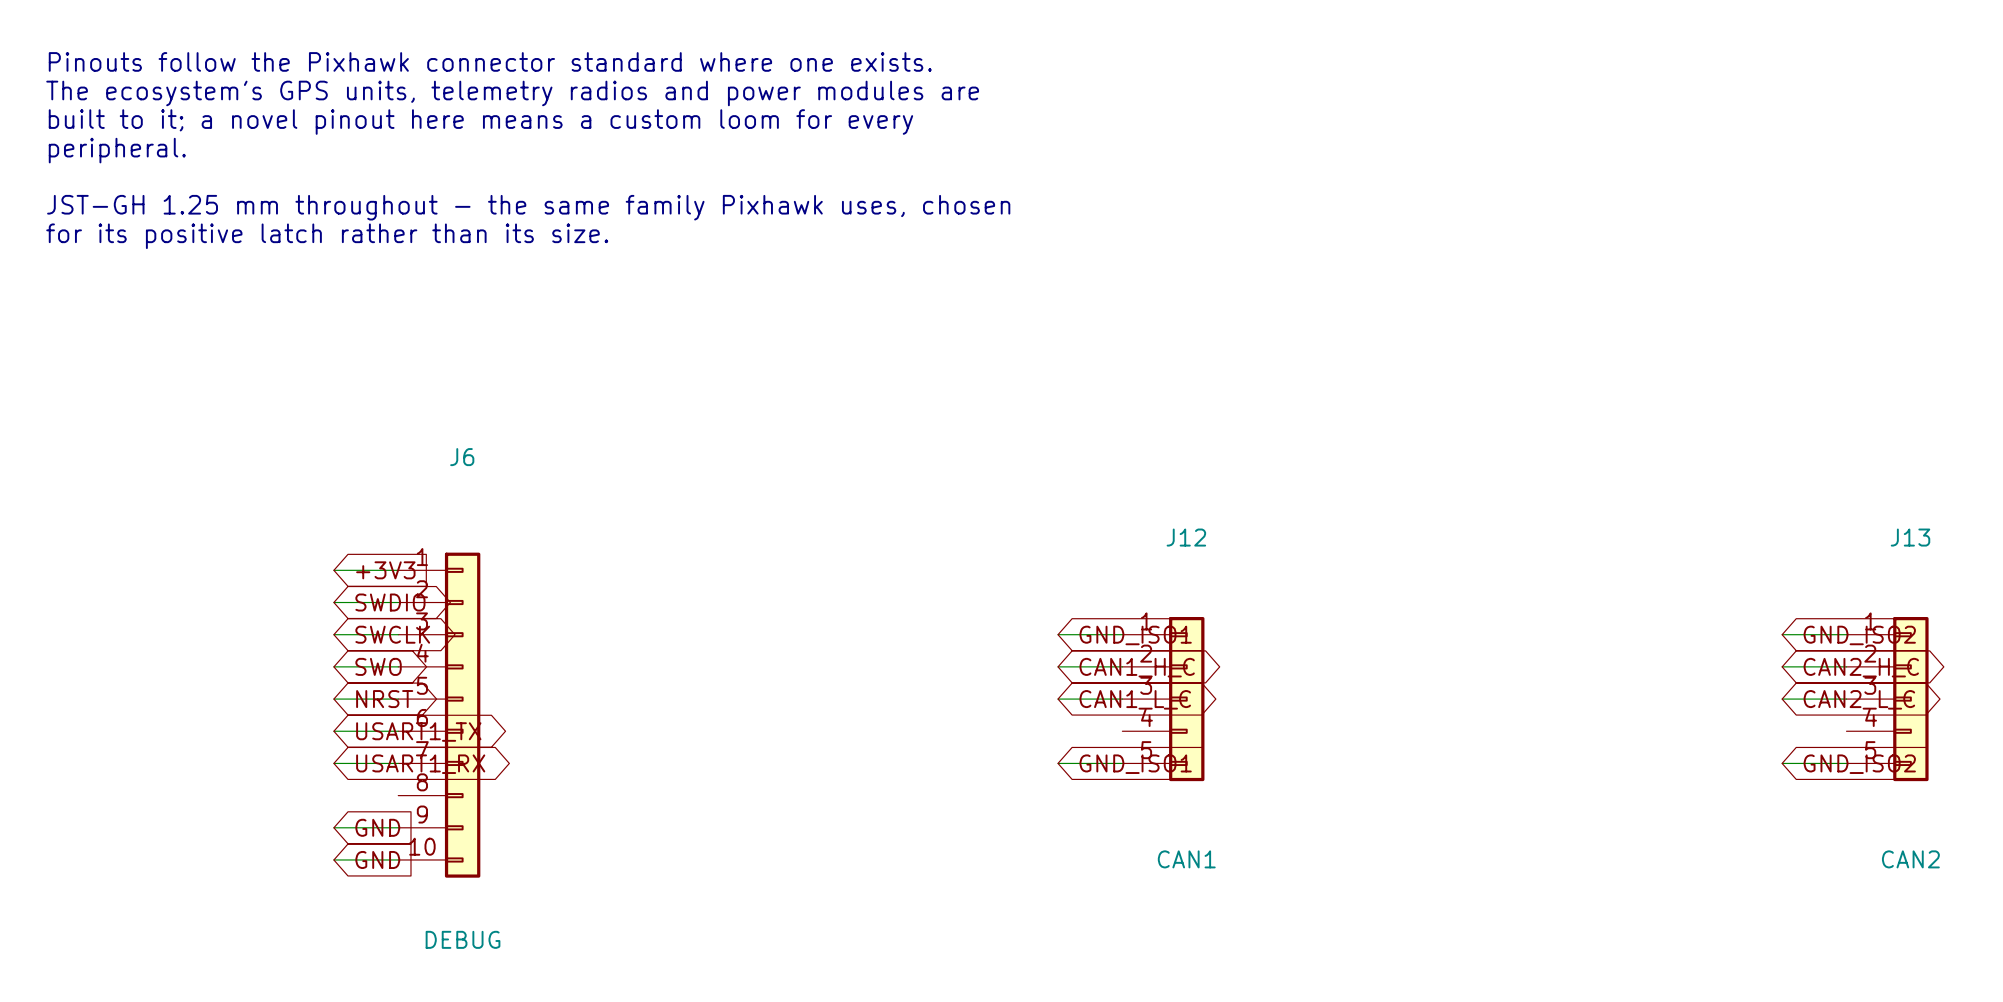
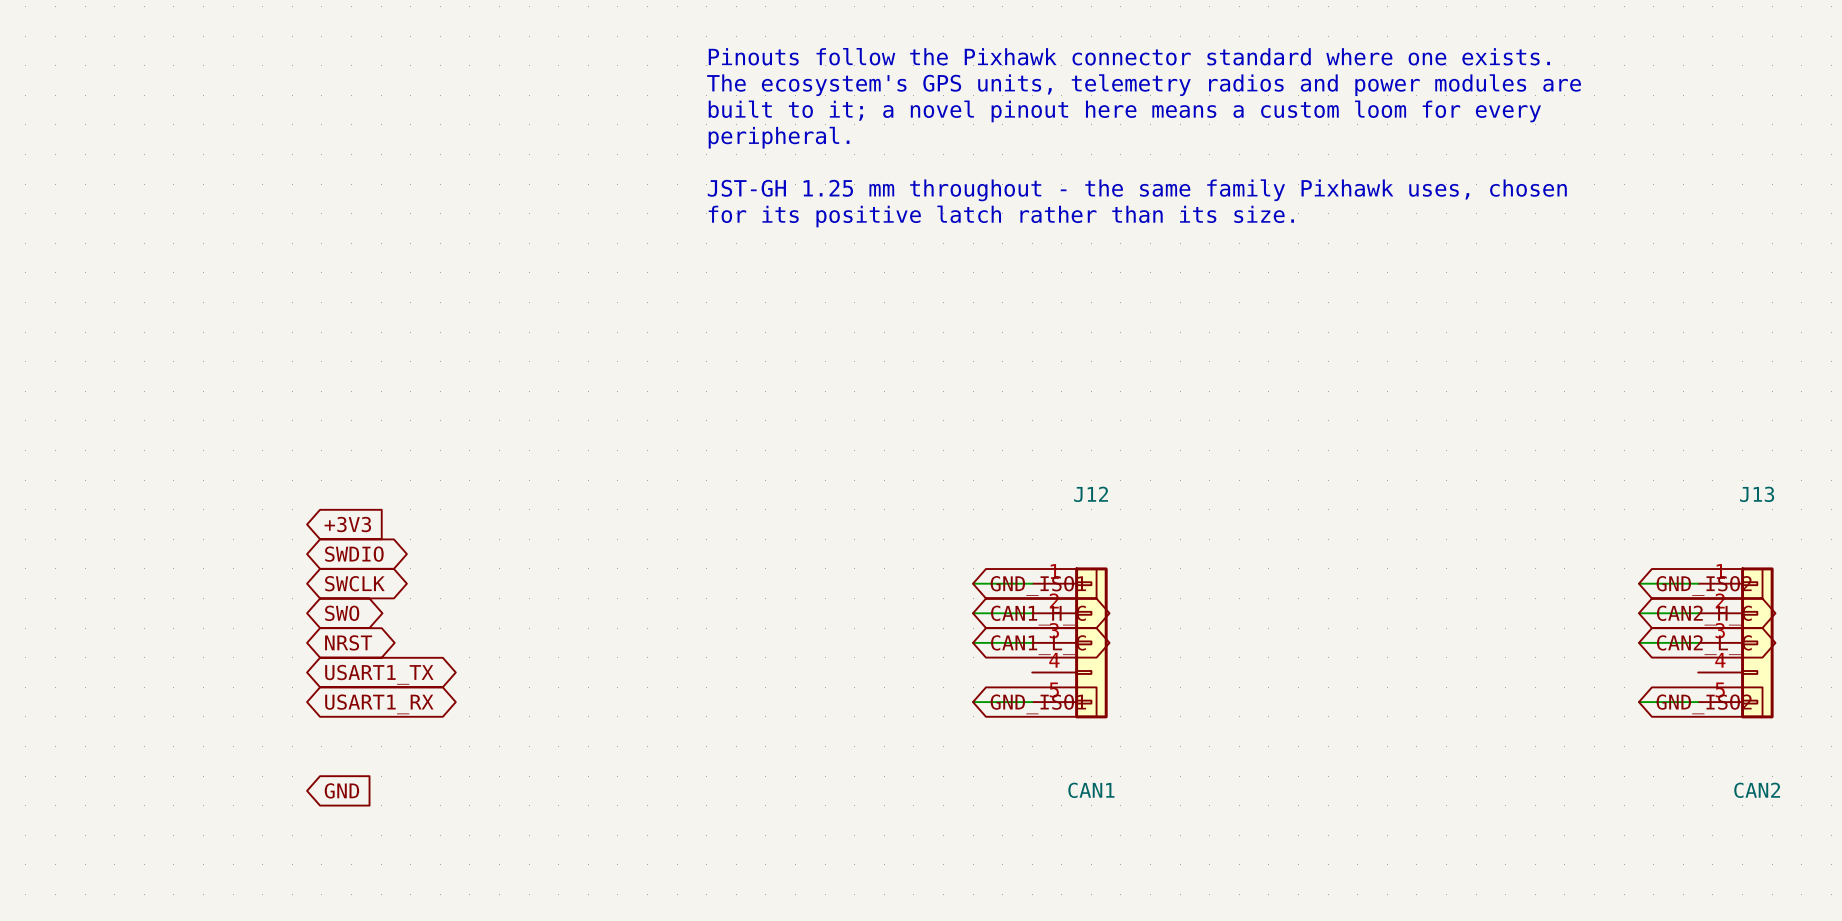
text: Pinouts follow the Pixhawk connector standard where one exists. (490, 61) -> none
text: none -> Pinouts follow the Pixhawk connector standard where one exists. (1129, 56)
text: The ecosystem's GPS units, telemetry radios and power modules are (512, 93) -> none
text: none -> The ecosystem's GPS units, telemetry radios and power modules are (1144, 85)
text: built to it; a novel pinout here means a custom loom for every (480, 122) -> none
text: none -> built to it; a novel pinout here means a custom loom for every (1124, 111)
text: peripheral. (117, 150) -> none
text: none -> peripheral. (779, 137)
text: JST-GH 1.25 mm throughout - the same family Pixhawk uses, chosen (528, 207) -> none
text: none -> JST-GH 1.25 mm throughout - the same family Pixhawk uses, chosen (1137, 190)
text: for its positive latch rather than its size. (327, 236) -> none
text: none -> for its positive latch rather than its size. (1001, 216)
wire: (333, 570) (398, 570) -> none
wire: (333, 602) (398, 602) -> none
wire: (333, 634) (398, 634) -> none
wire: (333, 666) (398, 666) -> none
wire: (333, 699) (398, 699) -> none
J6: DEBUG (439, 715) -> none
wire: (333, 731) (398, 731) -> none
wire: (333, 763) (398, 763) -> none
wire: (333, 827) (398, 827) -> none
global label: GND (377, 827) -> none
wire: (333, 859) (398, 859) -> none

